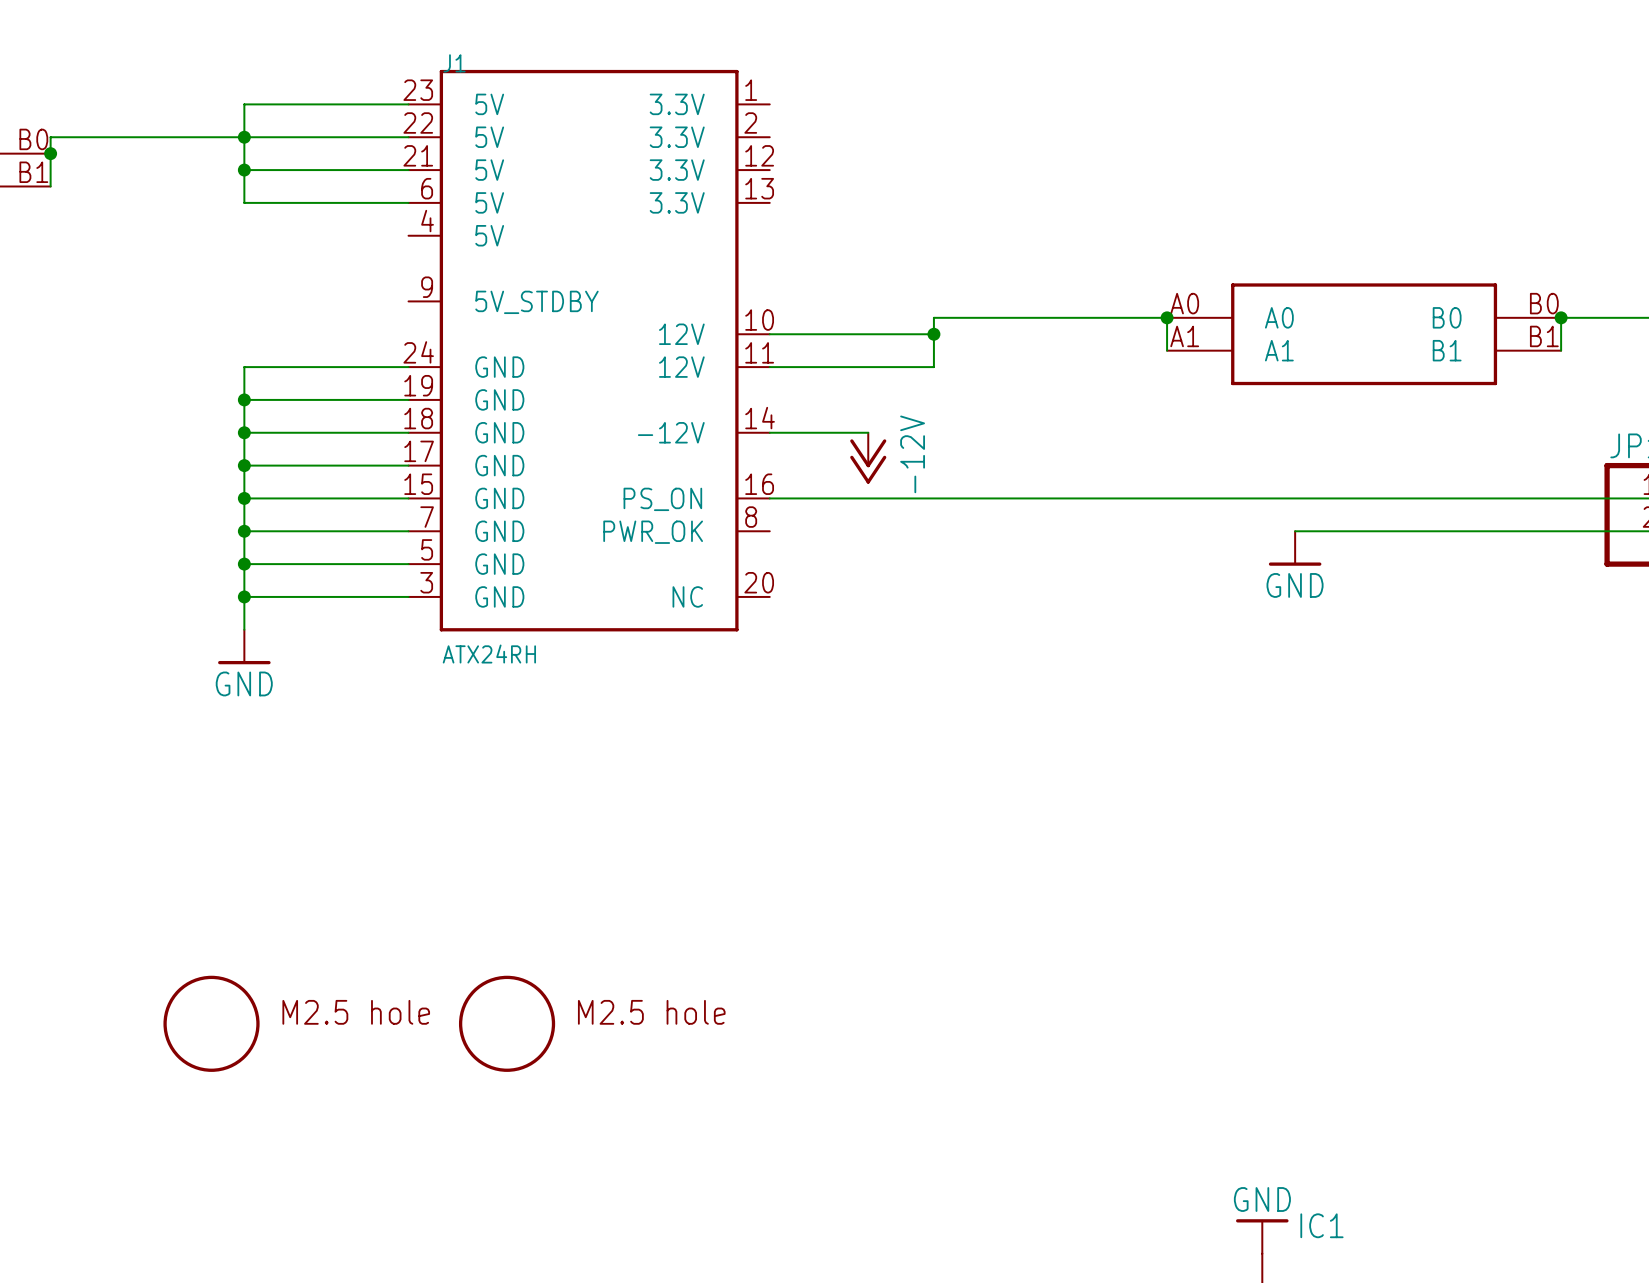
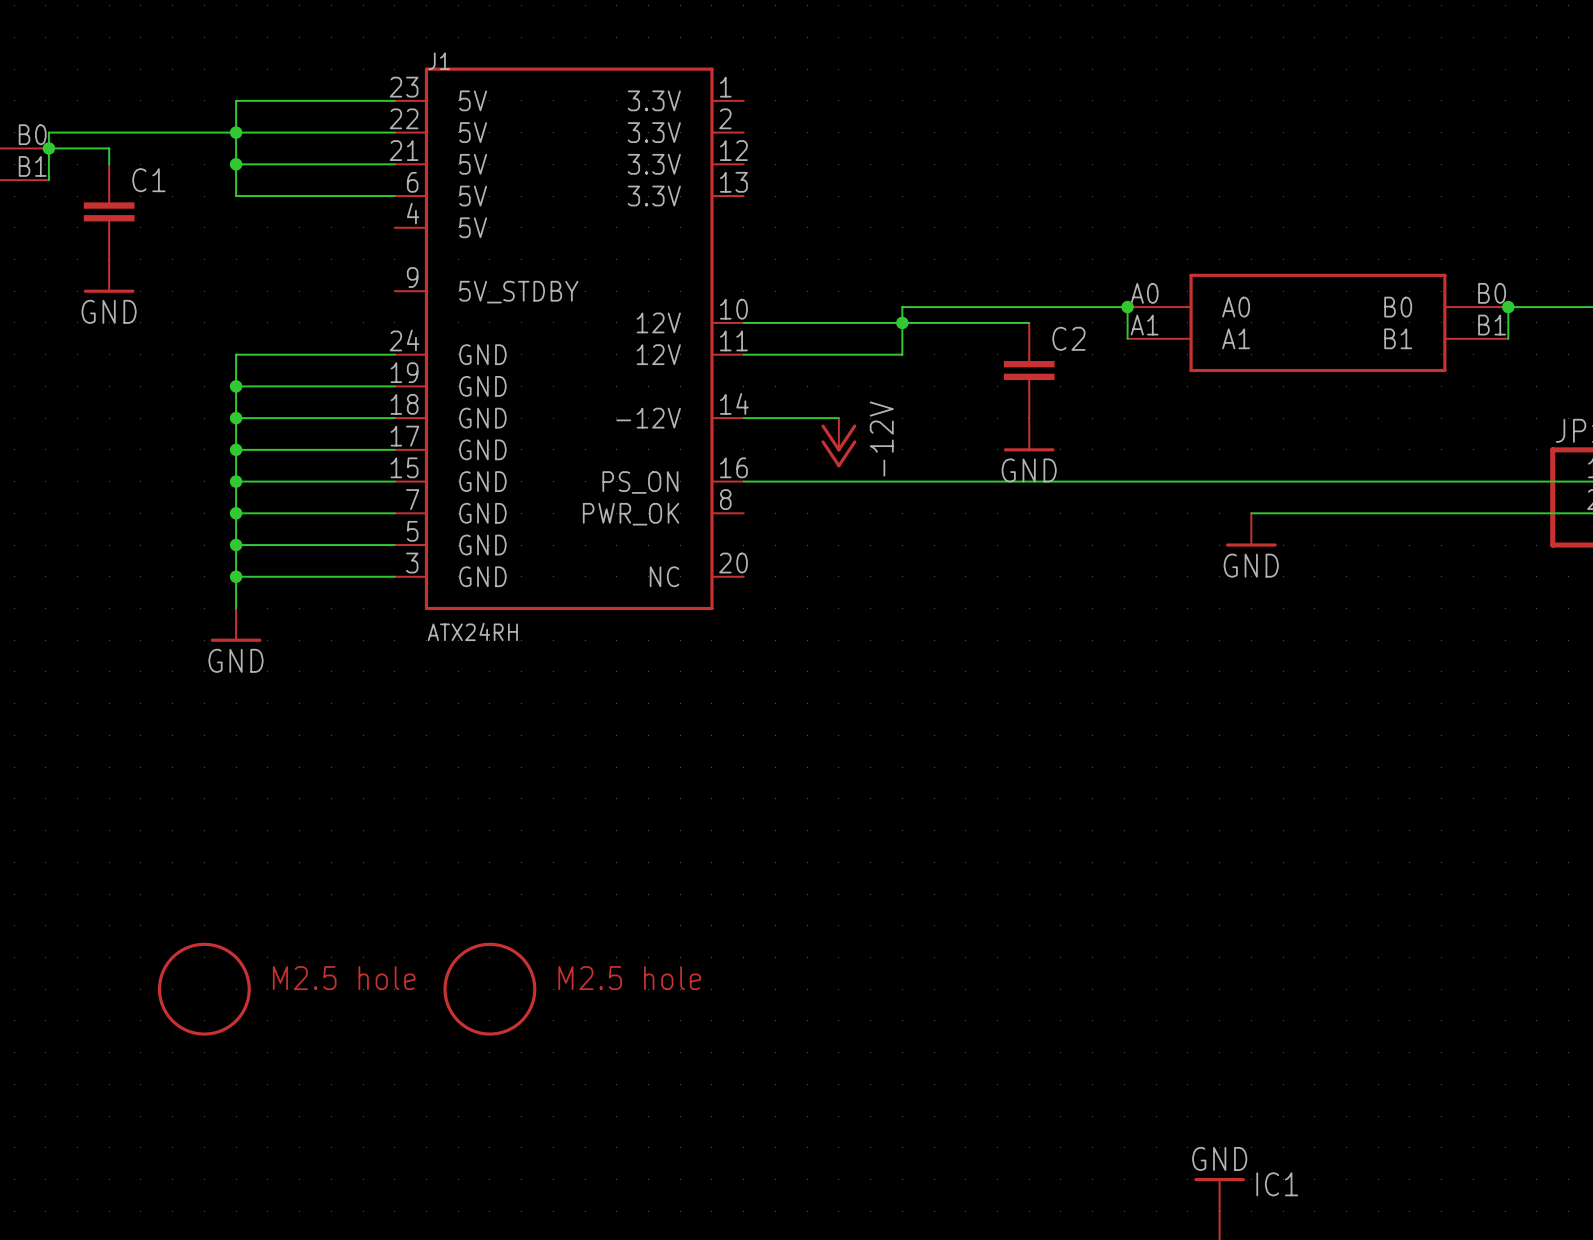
wire: none -> (48, 148) (109, 148) (109, 164)
C1: none -> (109, 211)
power symbol: none -> GND (109, 276)
wire: none -> (902, 322) (1029, 322)
C2: none -> (1029, 370)
power symbol: none -> GND (1029, 434)

